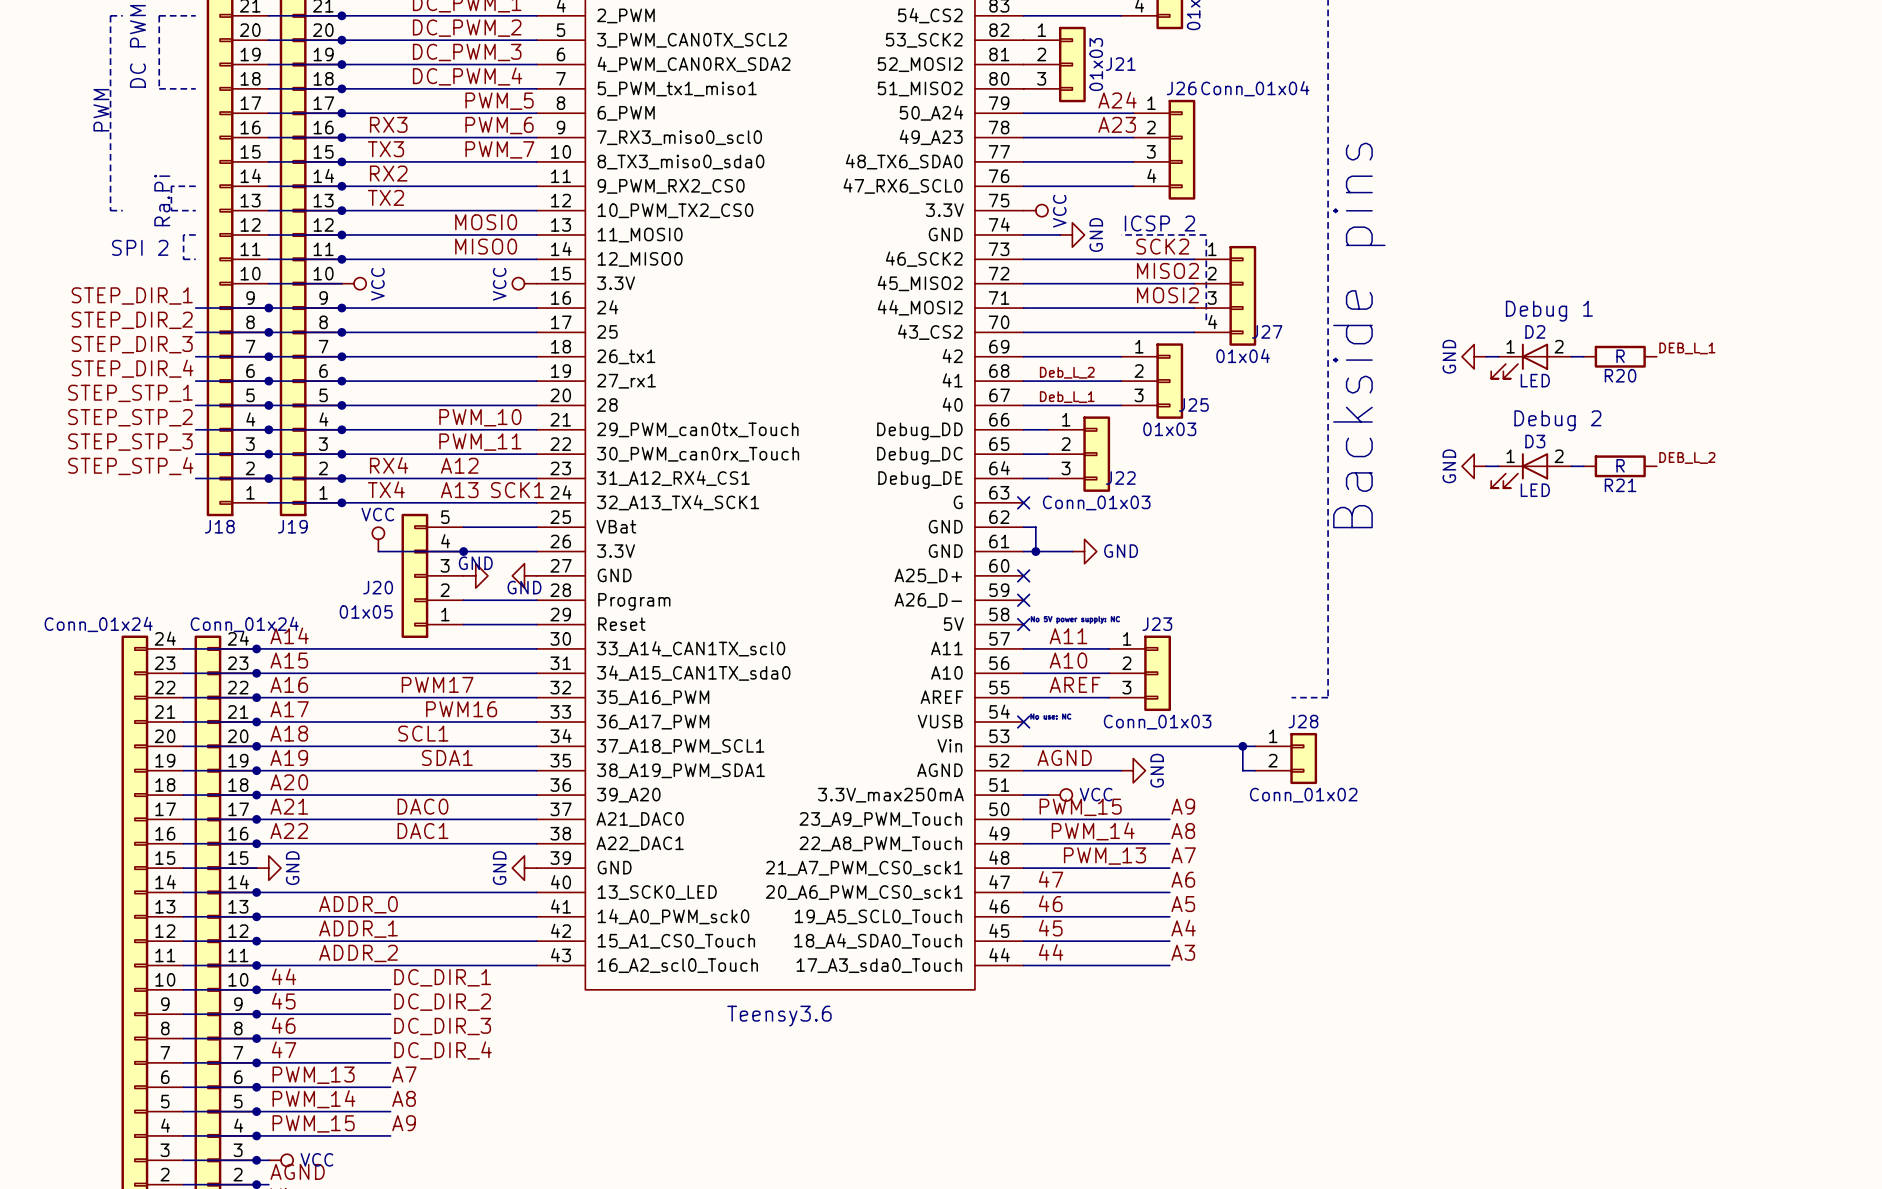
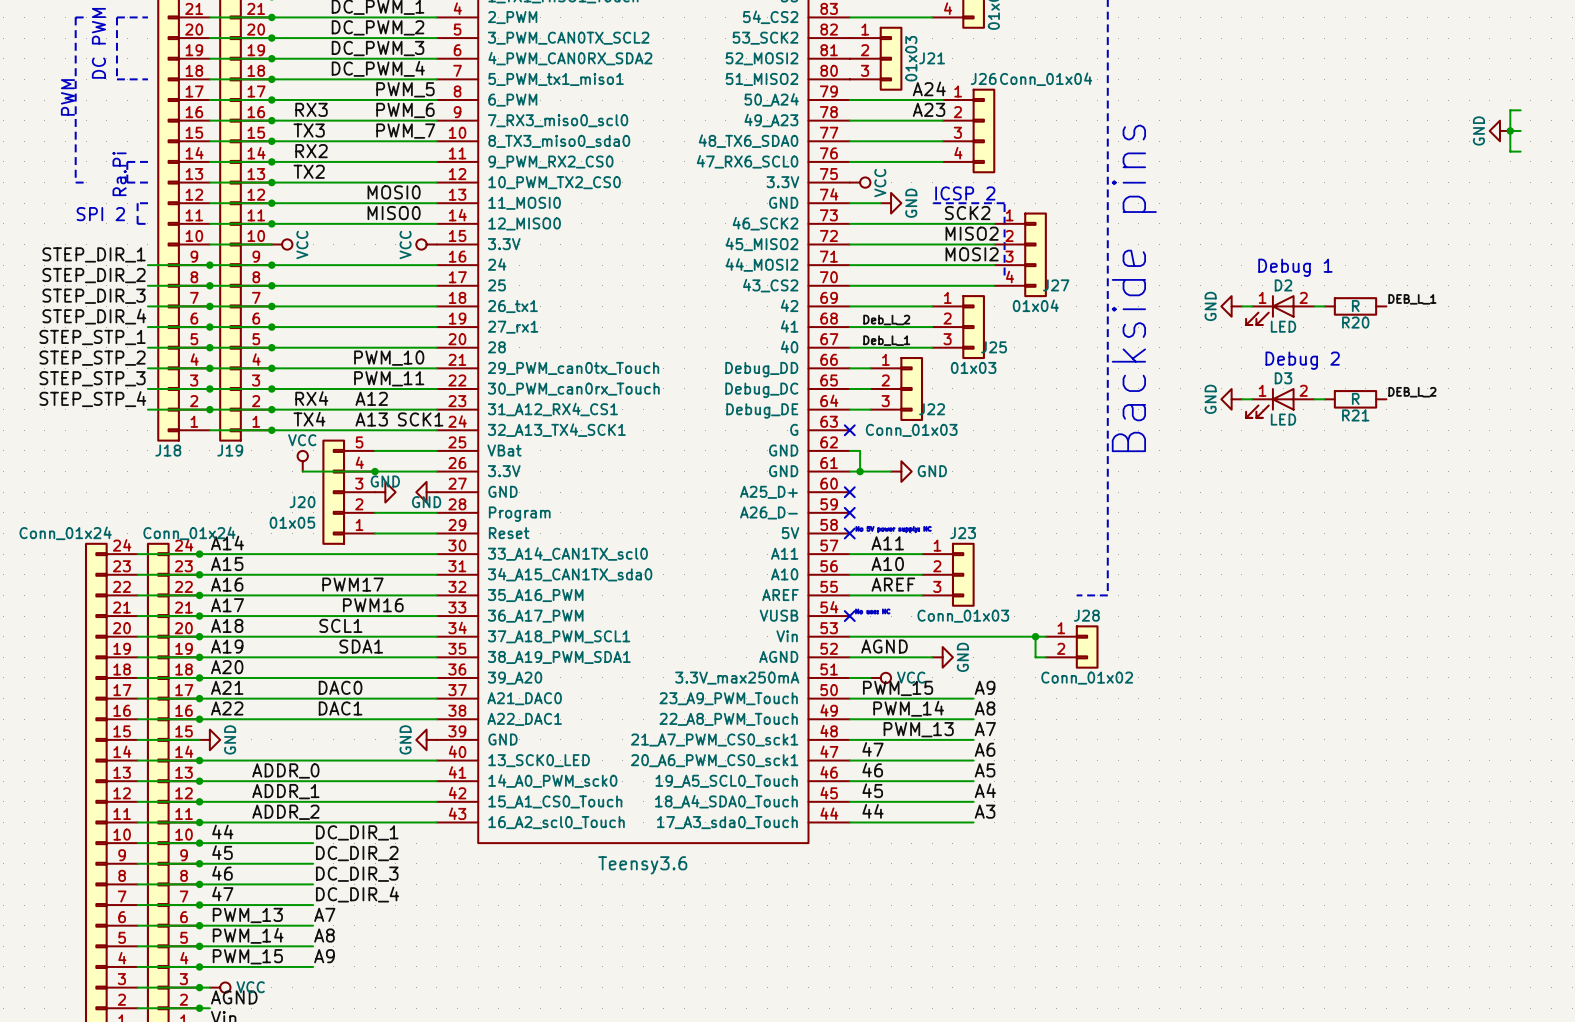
wire: none -> (1520, 110) (1510, 110) (1510, 151) (1520, 151)
power symbol: none -> GND (1499, 130)
wire: none -> (1510, 130) (1520, 130)
junction: none -> (1510, 130)

